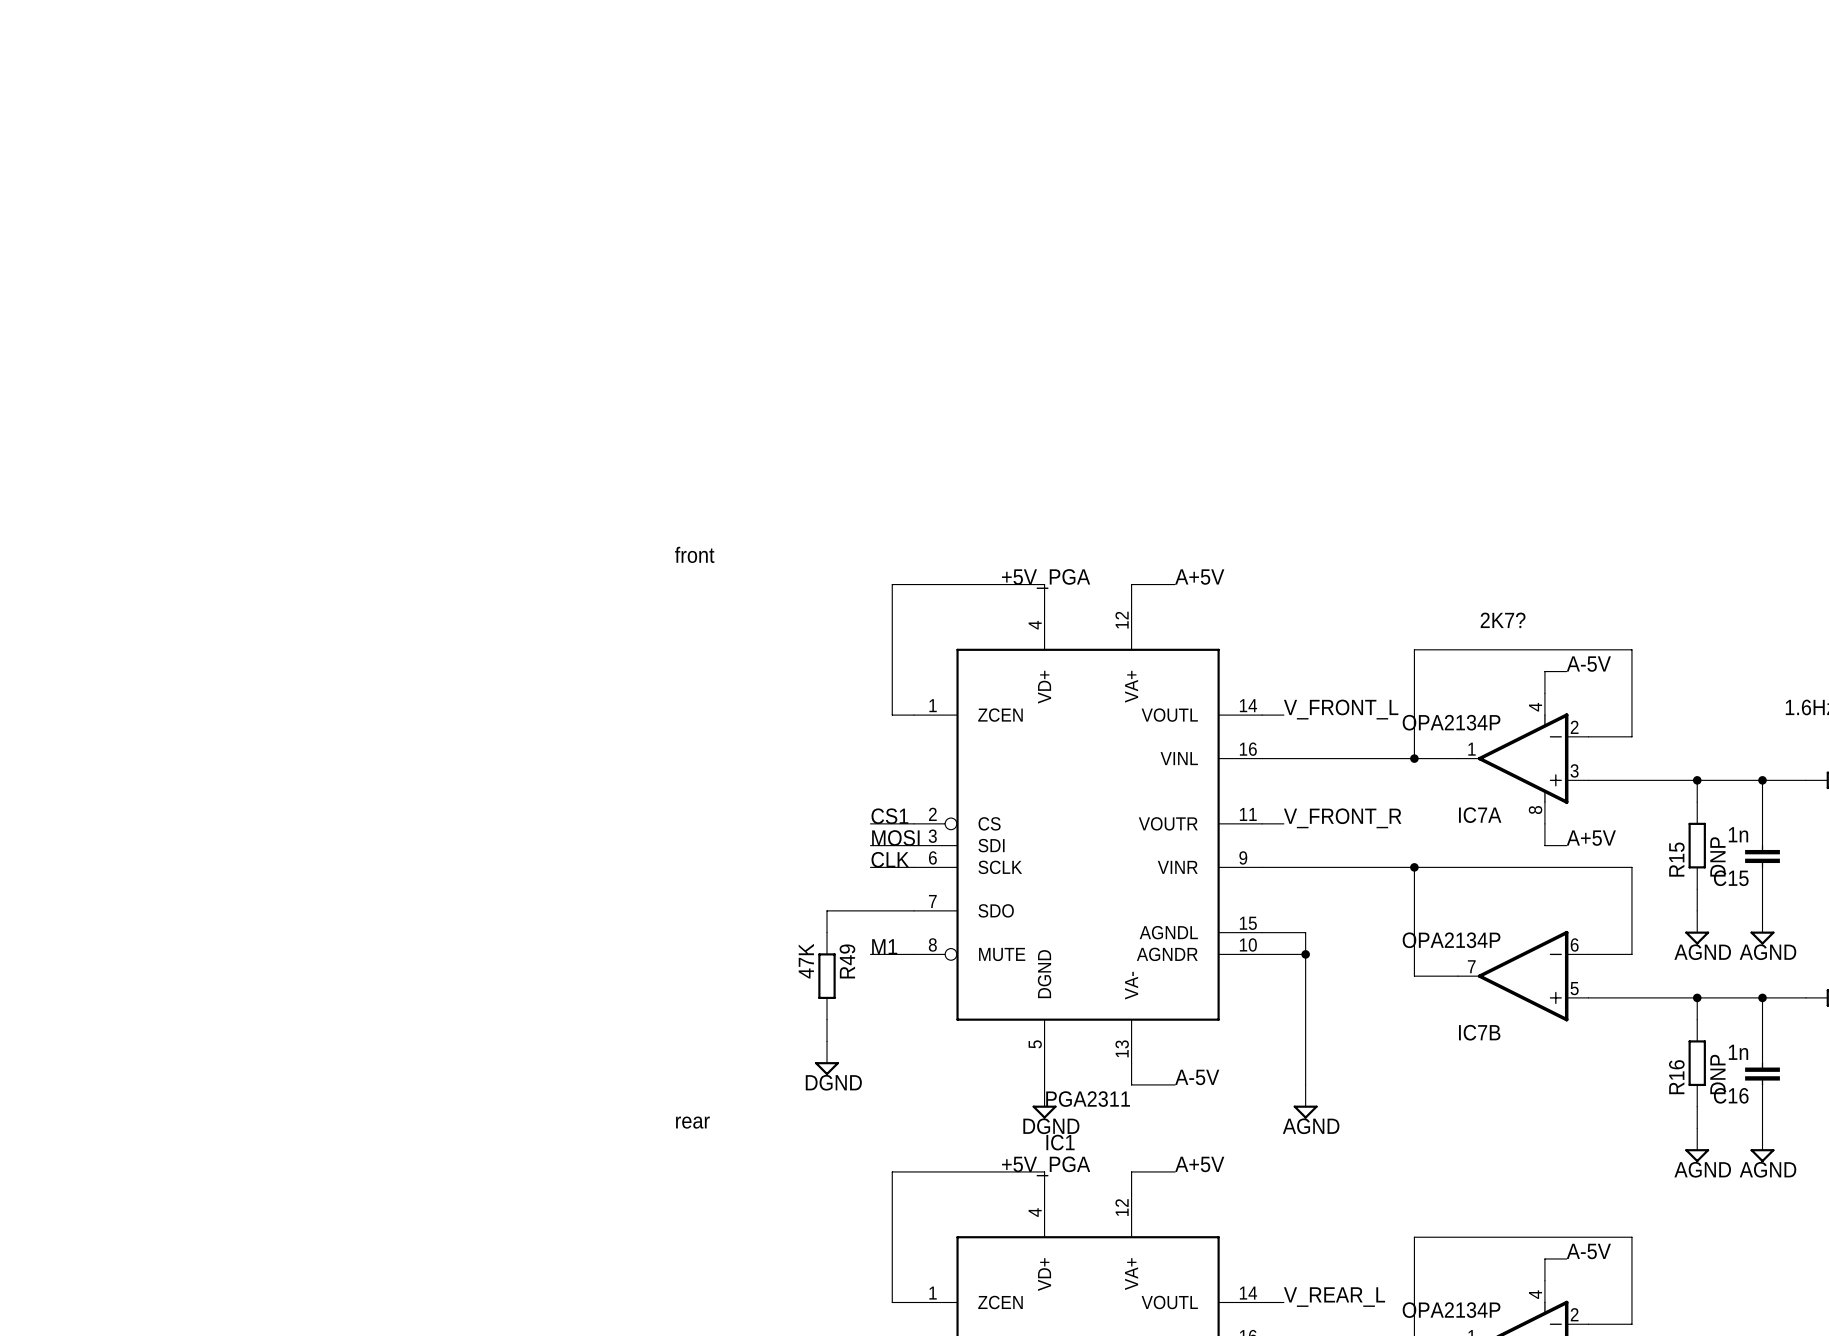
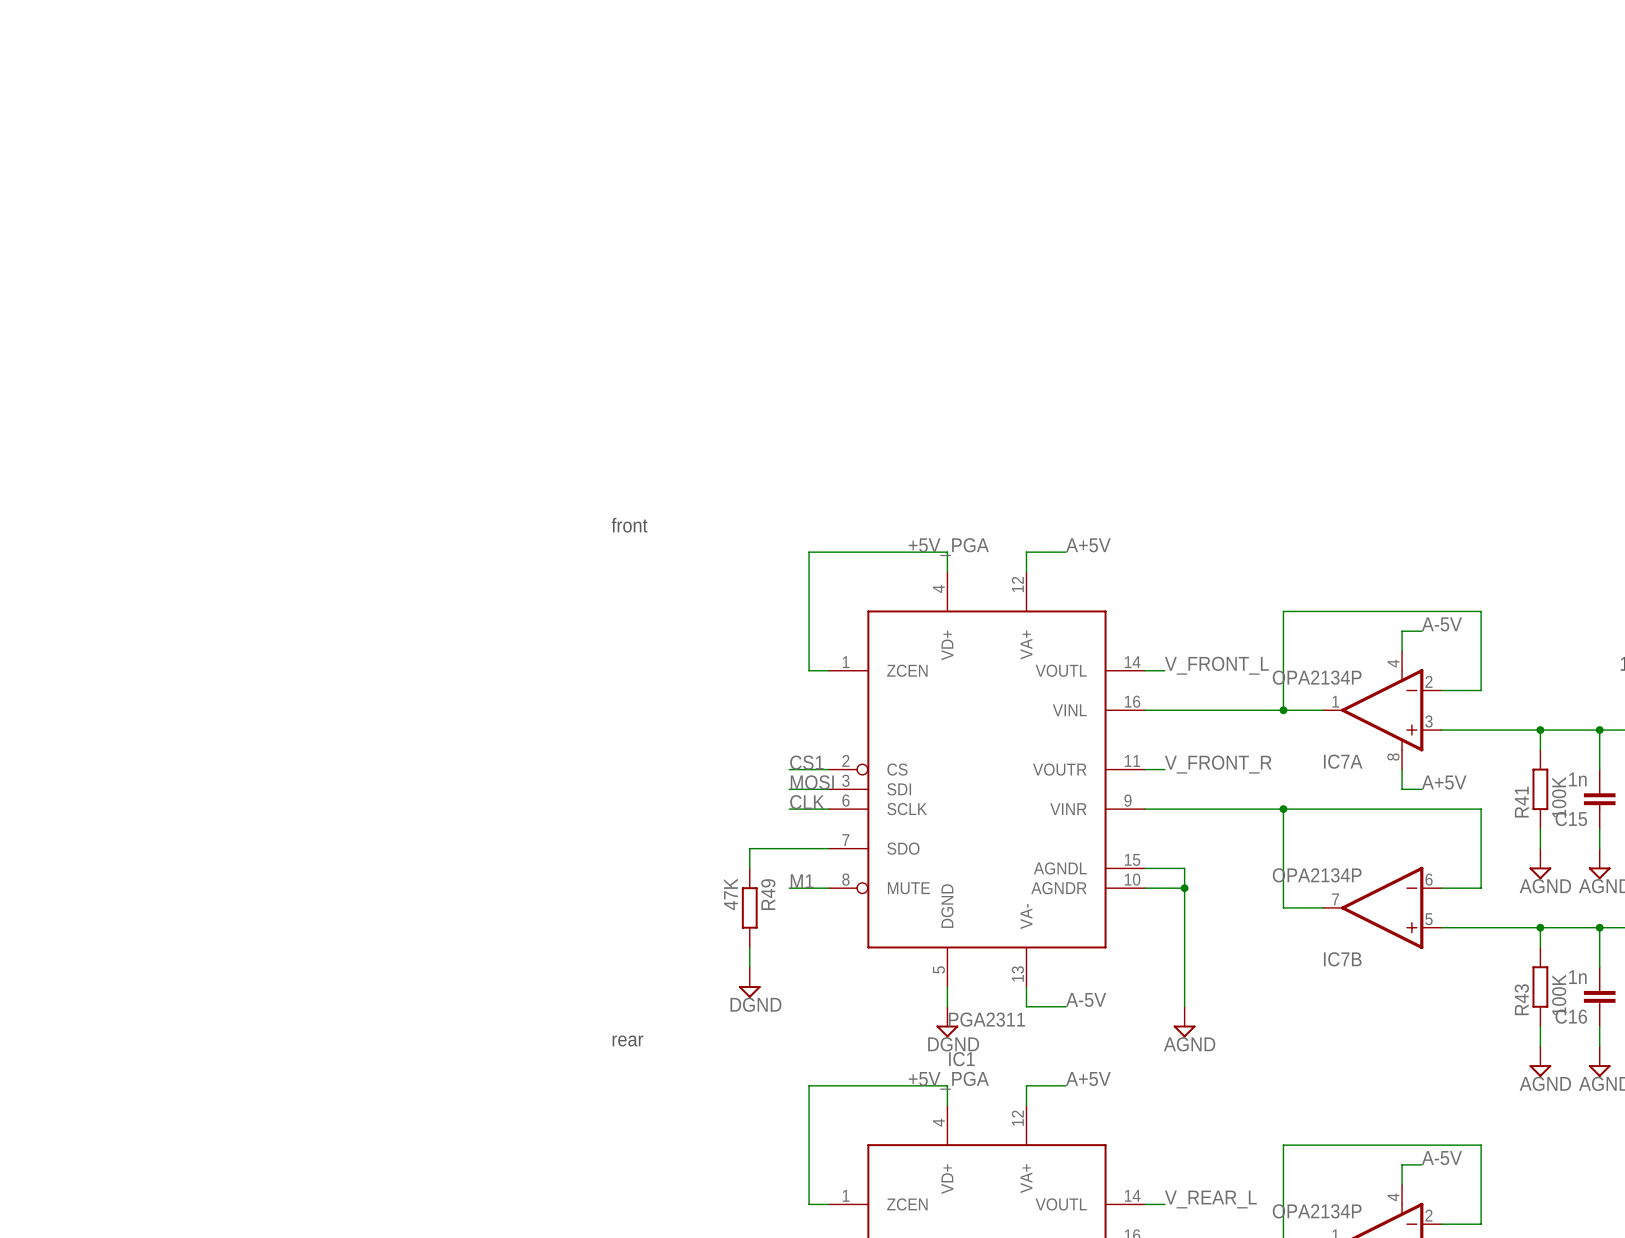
text: 2K7? (1503, 620) -> none
R15 value: DNP (1717, 856) -> 100K (1559, 797)
R15 name: R15 (1676, 859) -> R41 (1521, 802)
R16 value: DNP (1717, 1074) -> 100K (1559, 994)
R16 name: R16 (1676, 1077) -> R43 (1521, 999)

